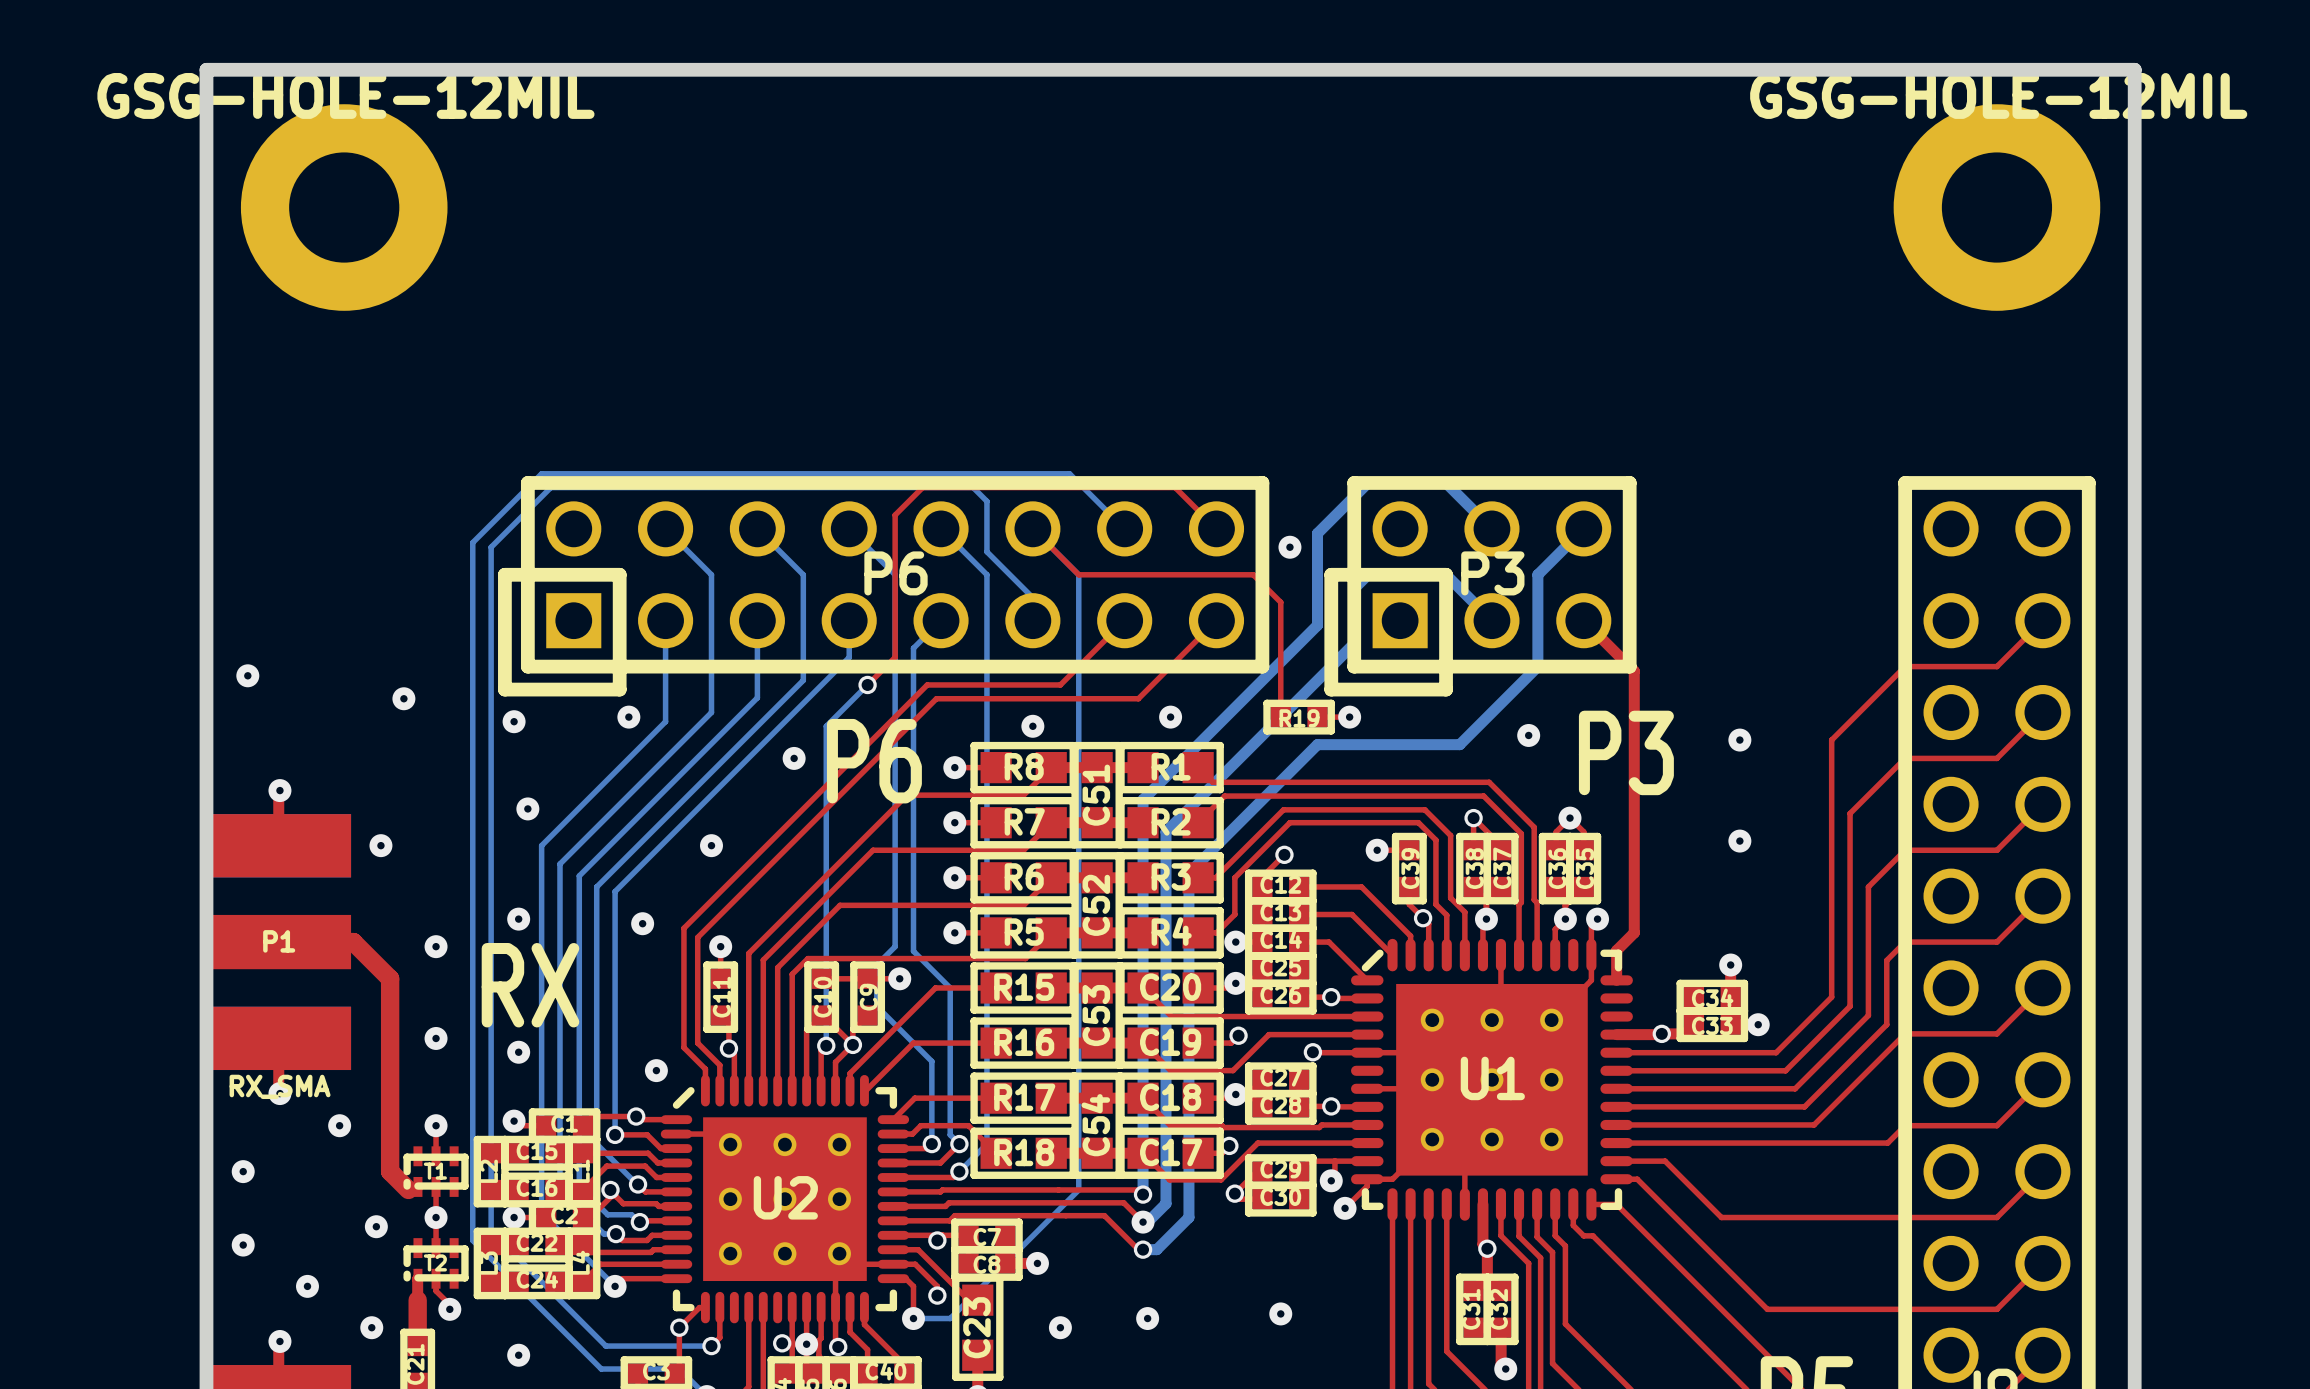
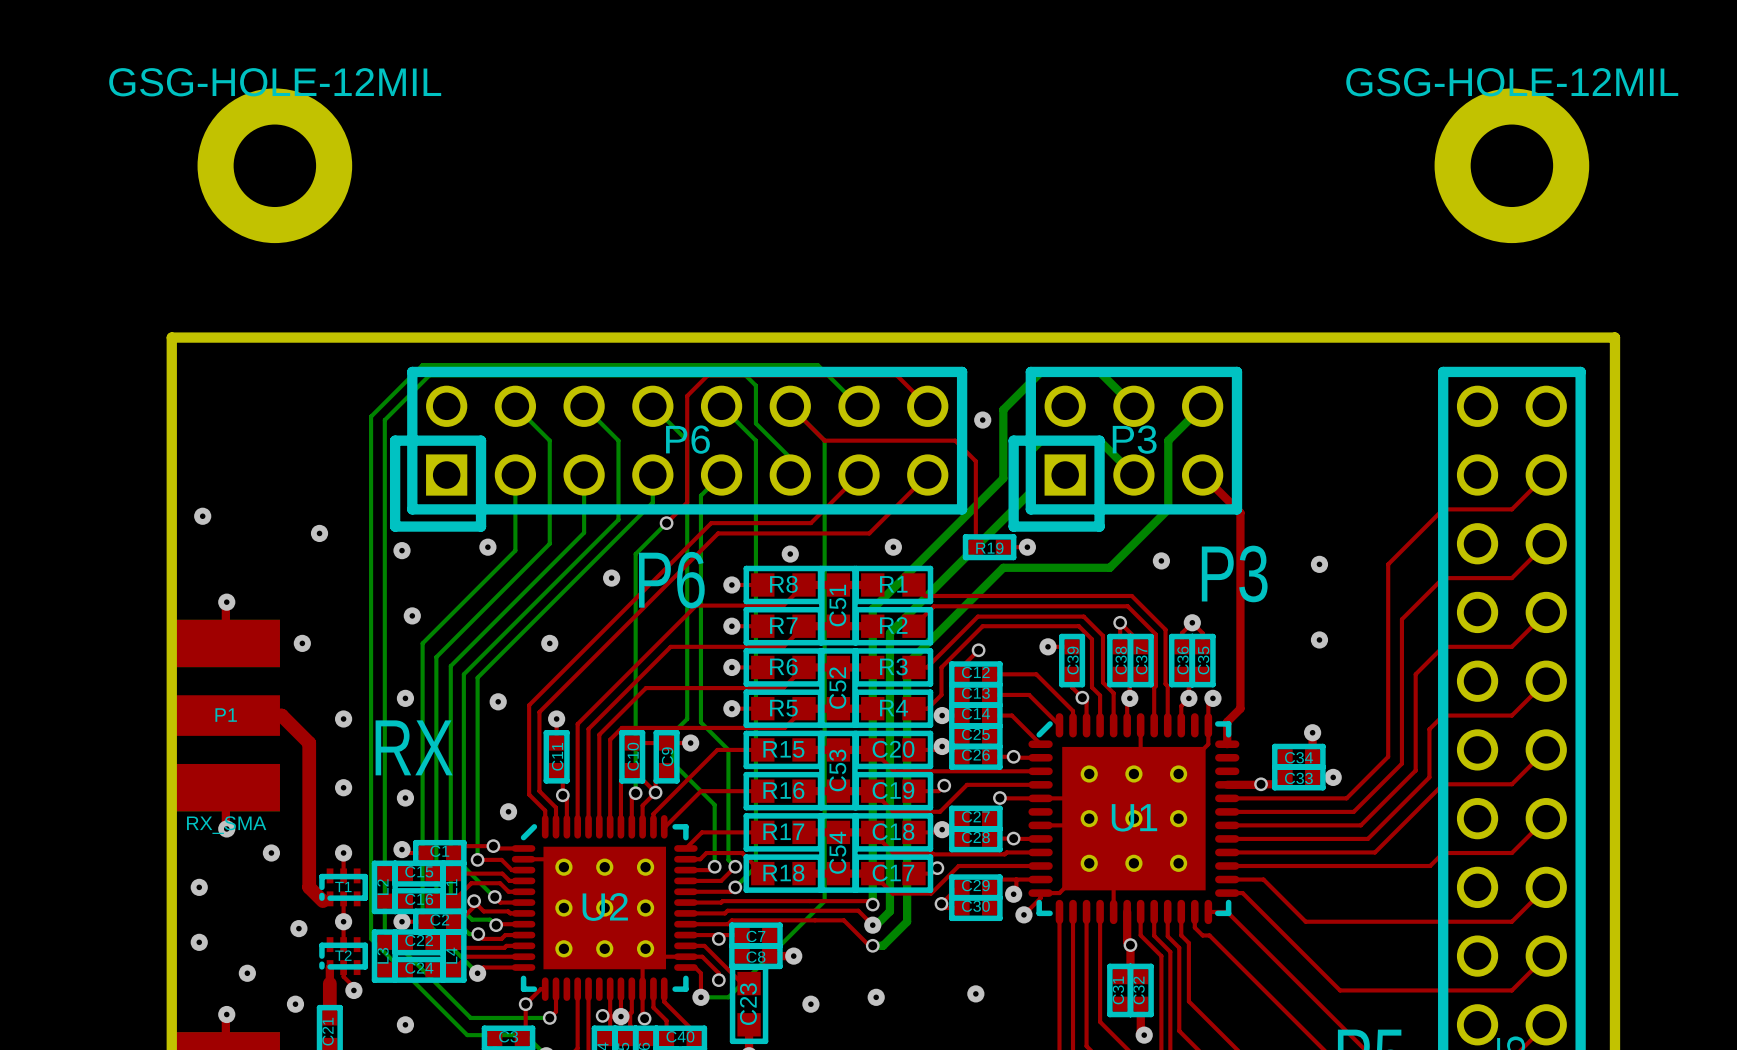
board edge: (206, 437) (206, 69) (2134, 69) (2134, 437) -> (171, 337) (1614, 337)

